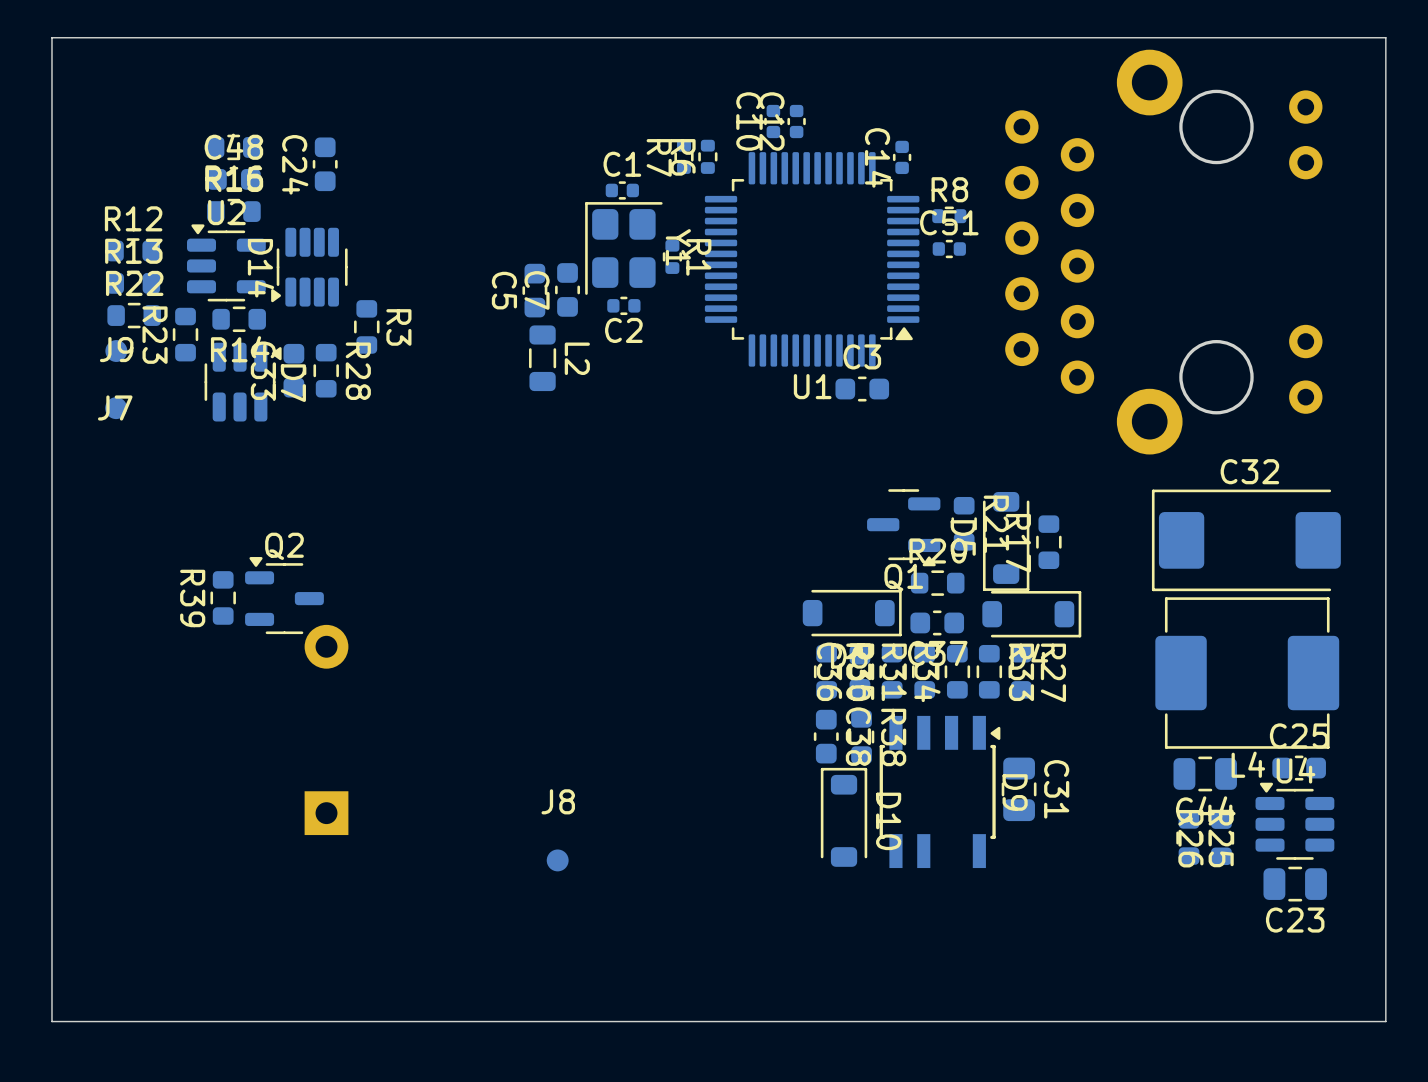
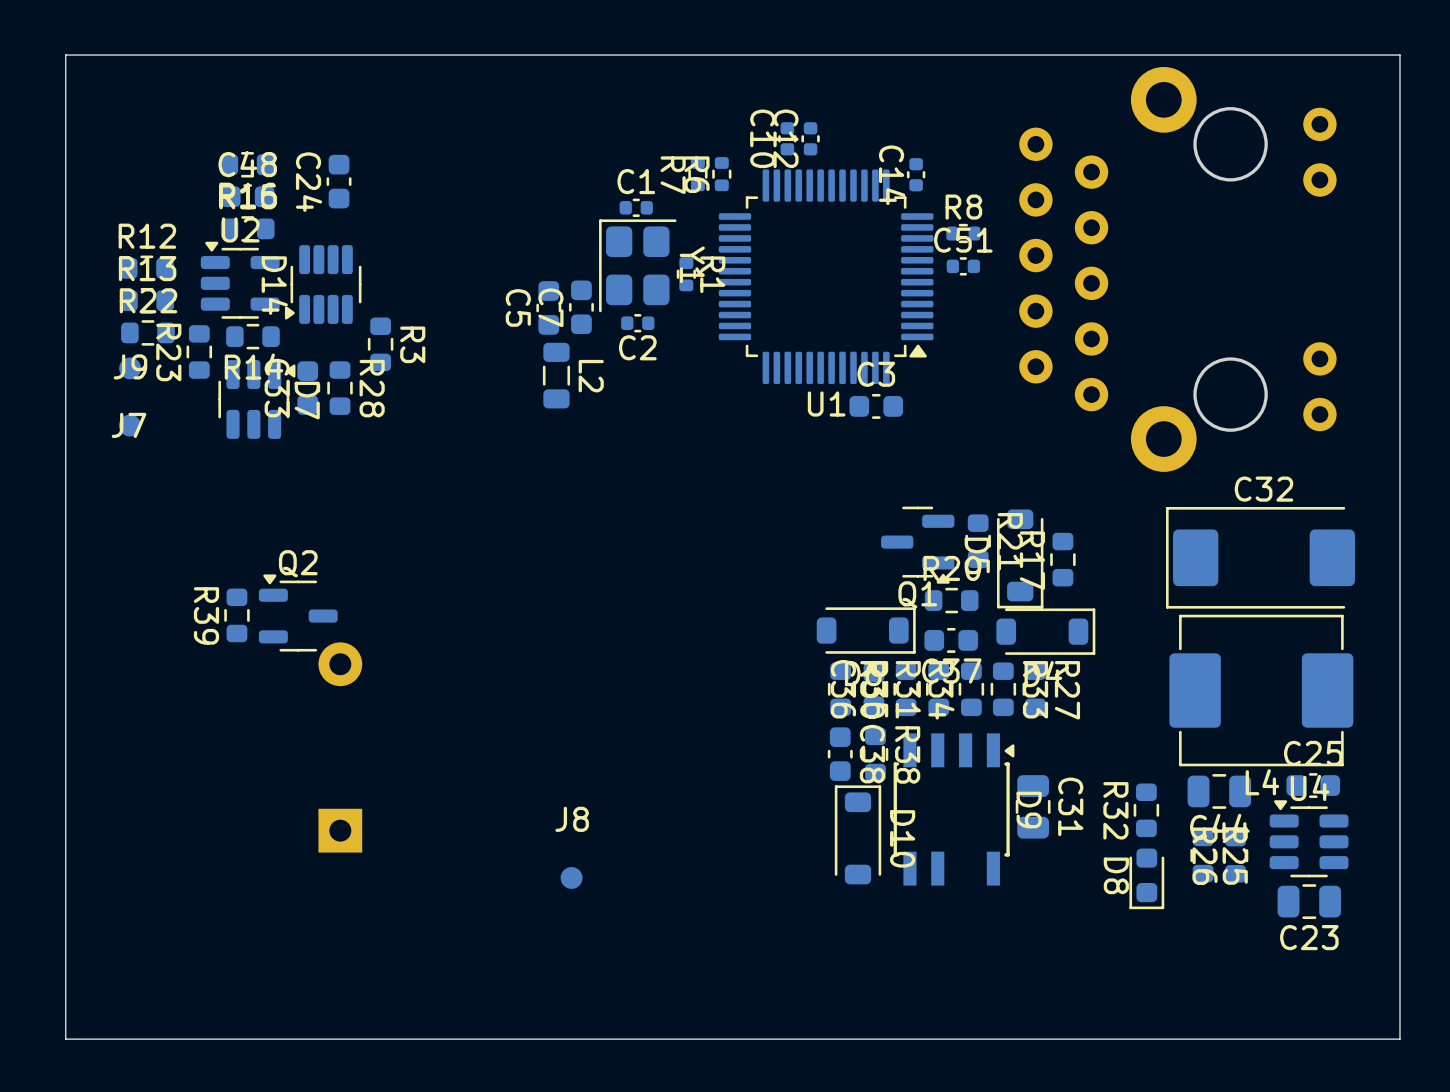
R32: none -> (1146, 810)
D8: none -> (1146, 878)

